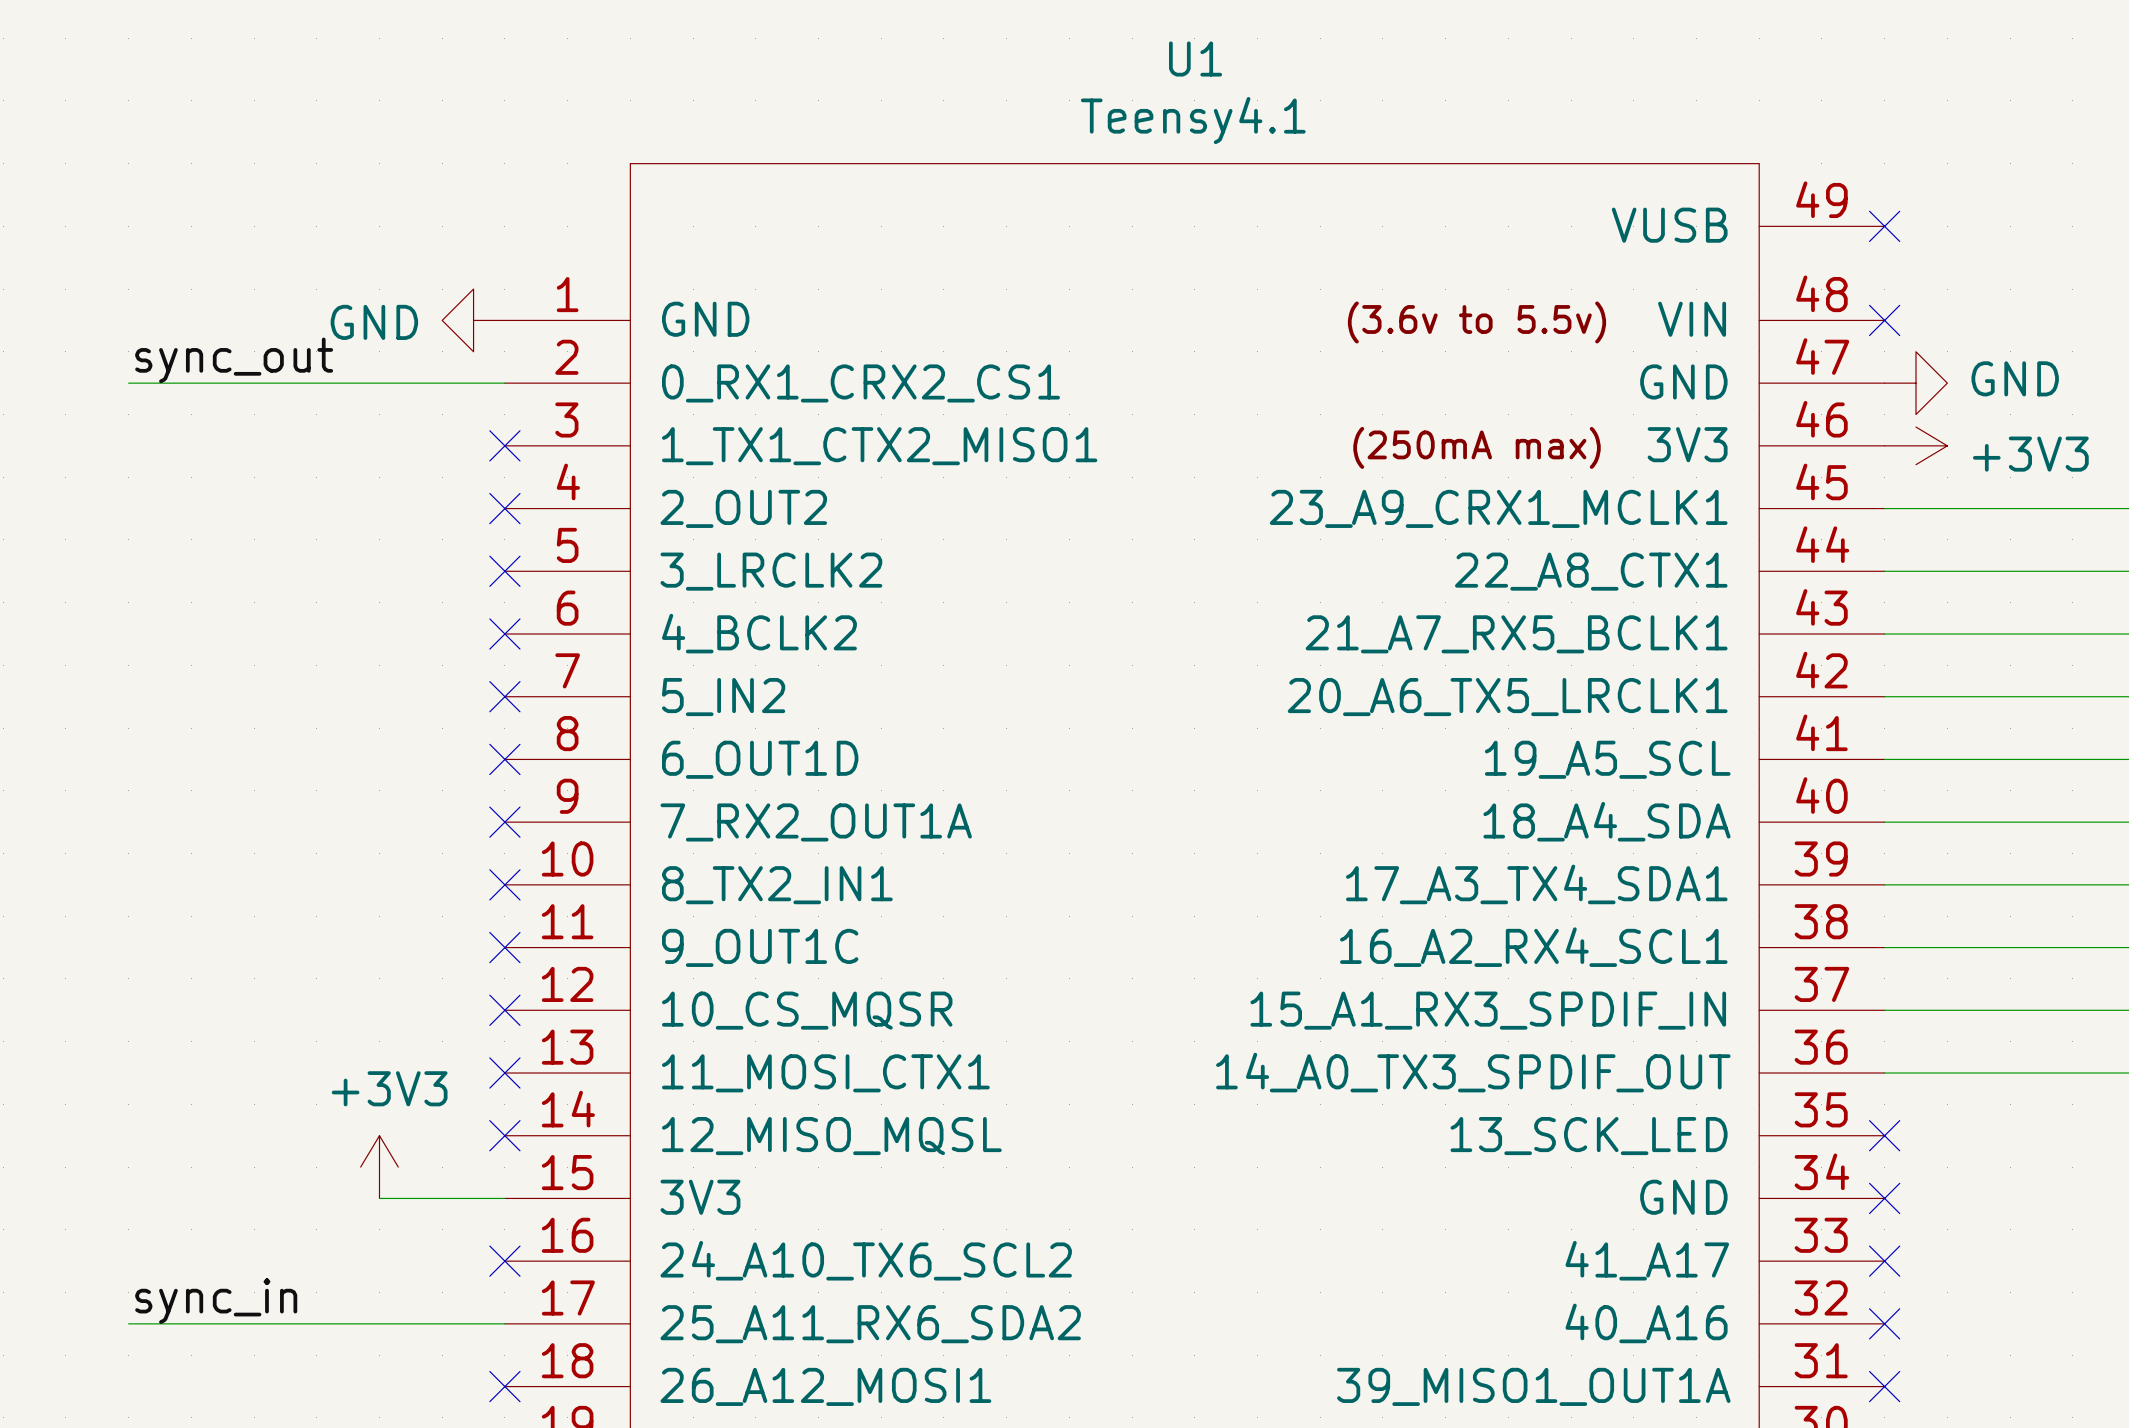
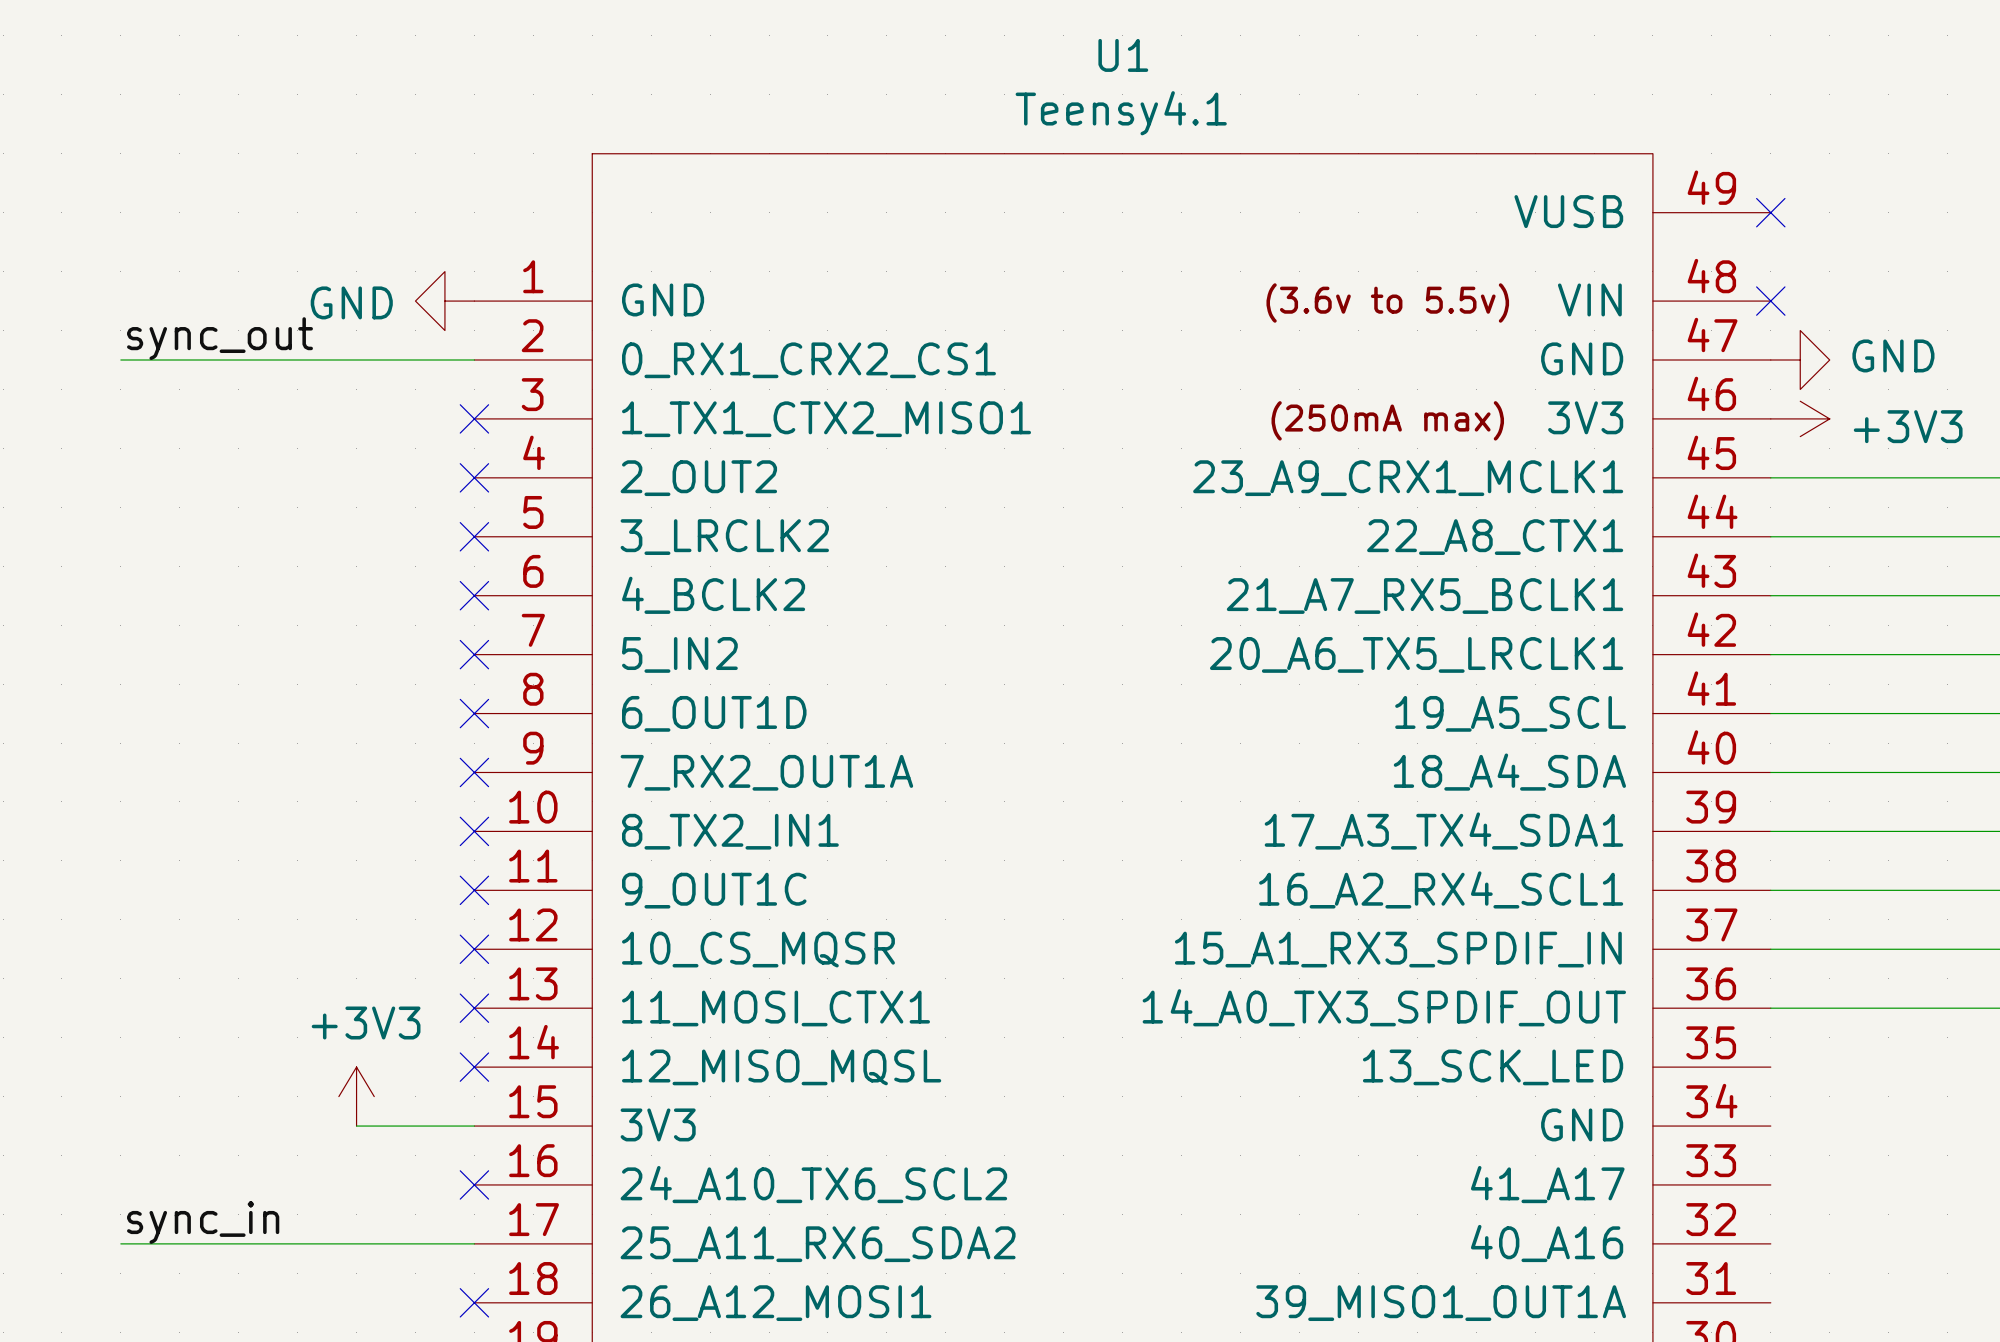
no-connect mark: (1884, 1135) -> none
no-connect mark: (1884, 1198) -> none
no-connect mark: (1884, 1261) -> none
no-connect mark: (1884, 1323) -> none
no-connect mark: (1884, 1386) -> none

